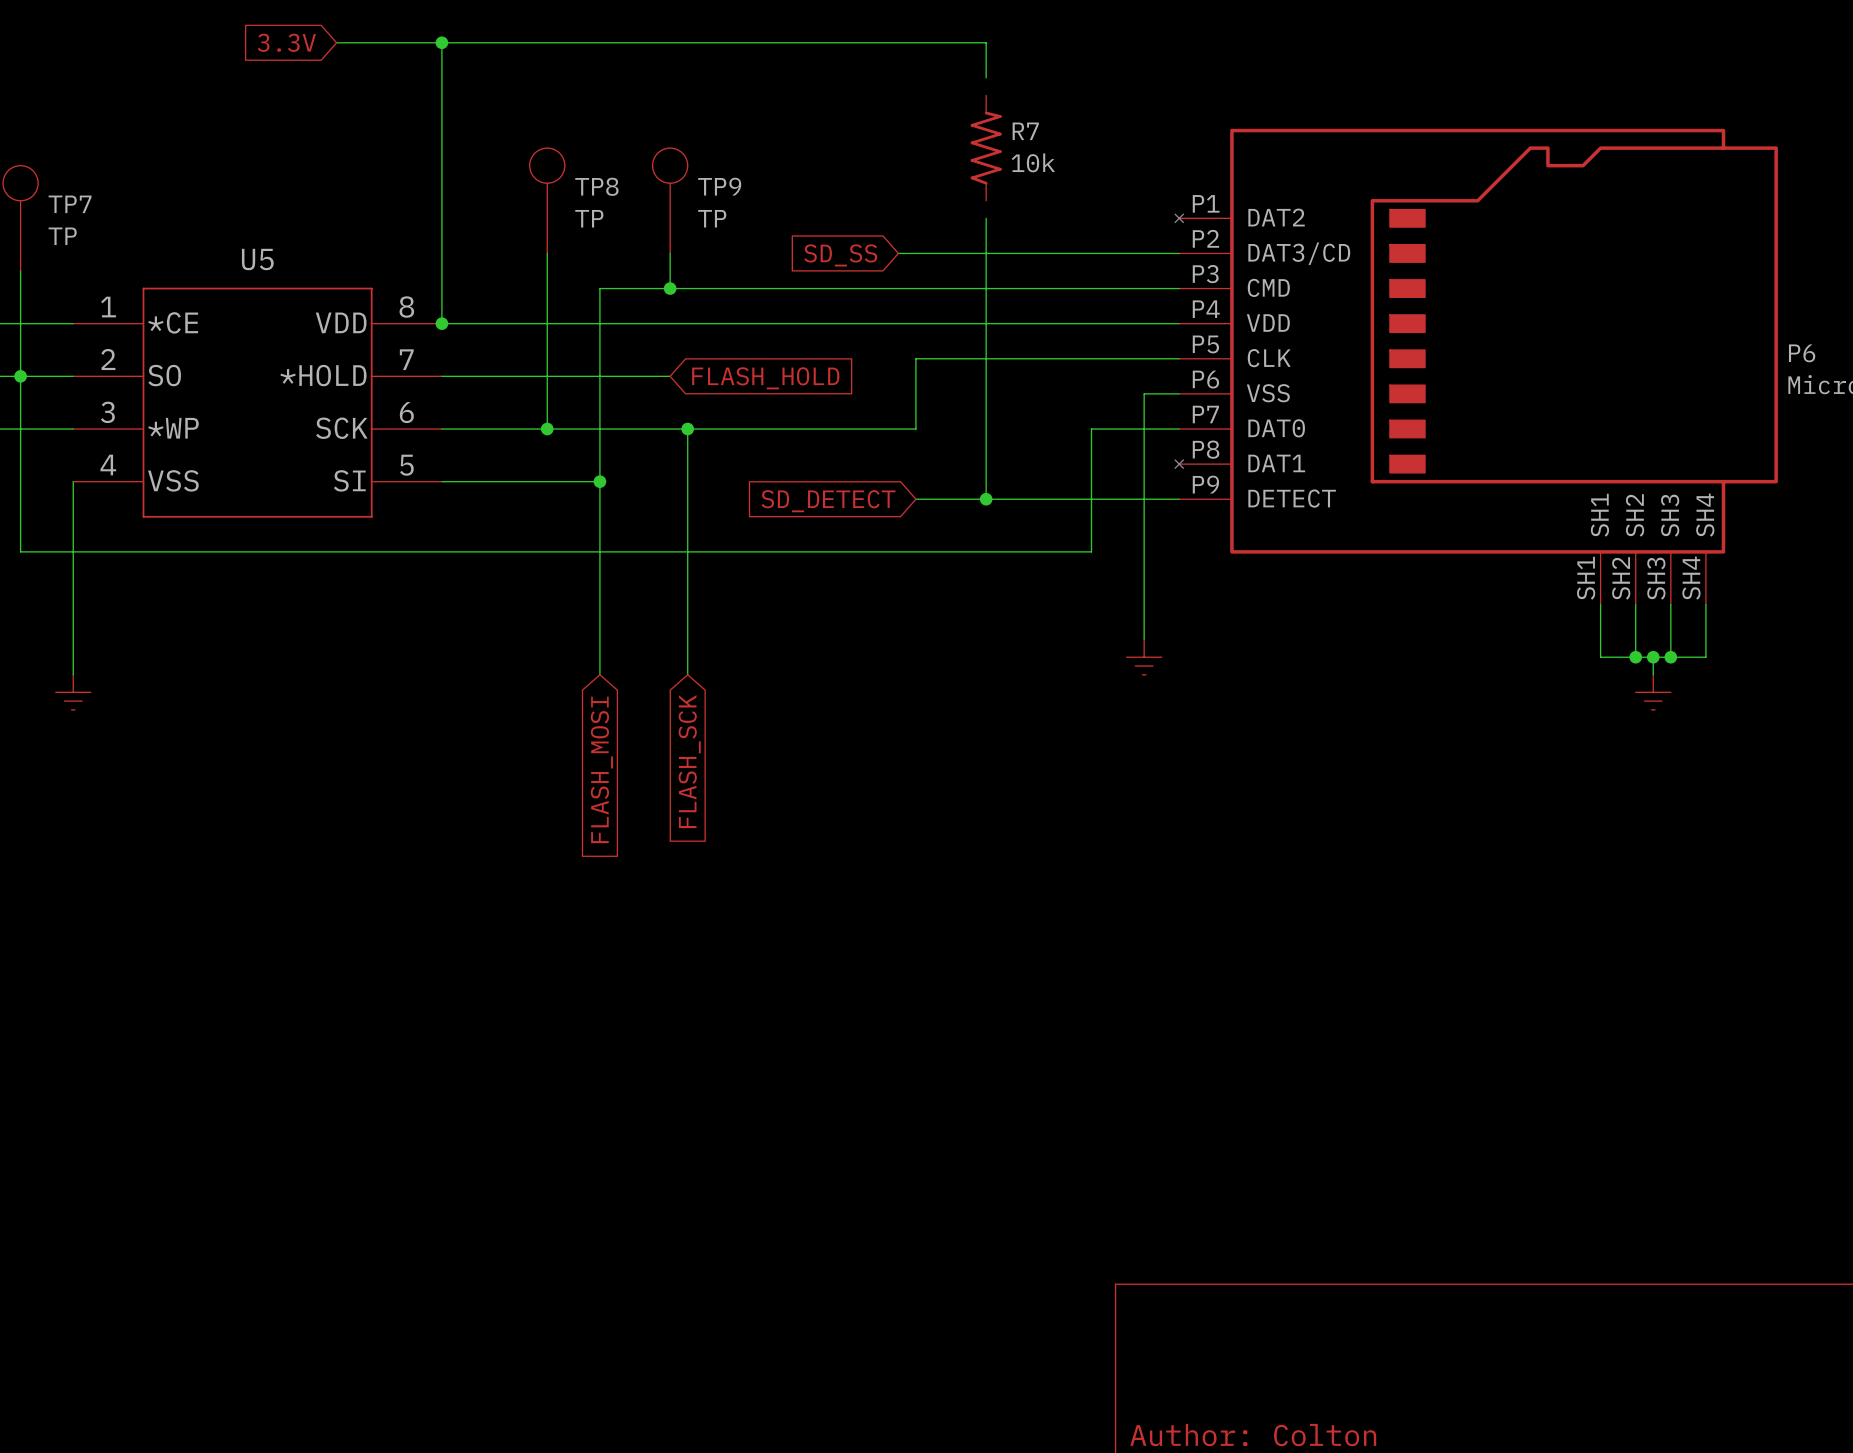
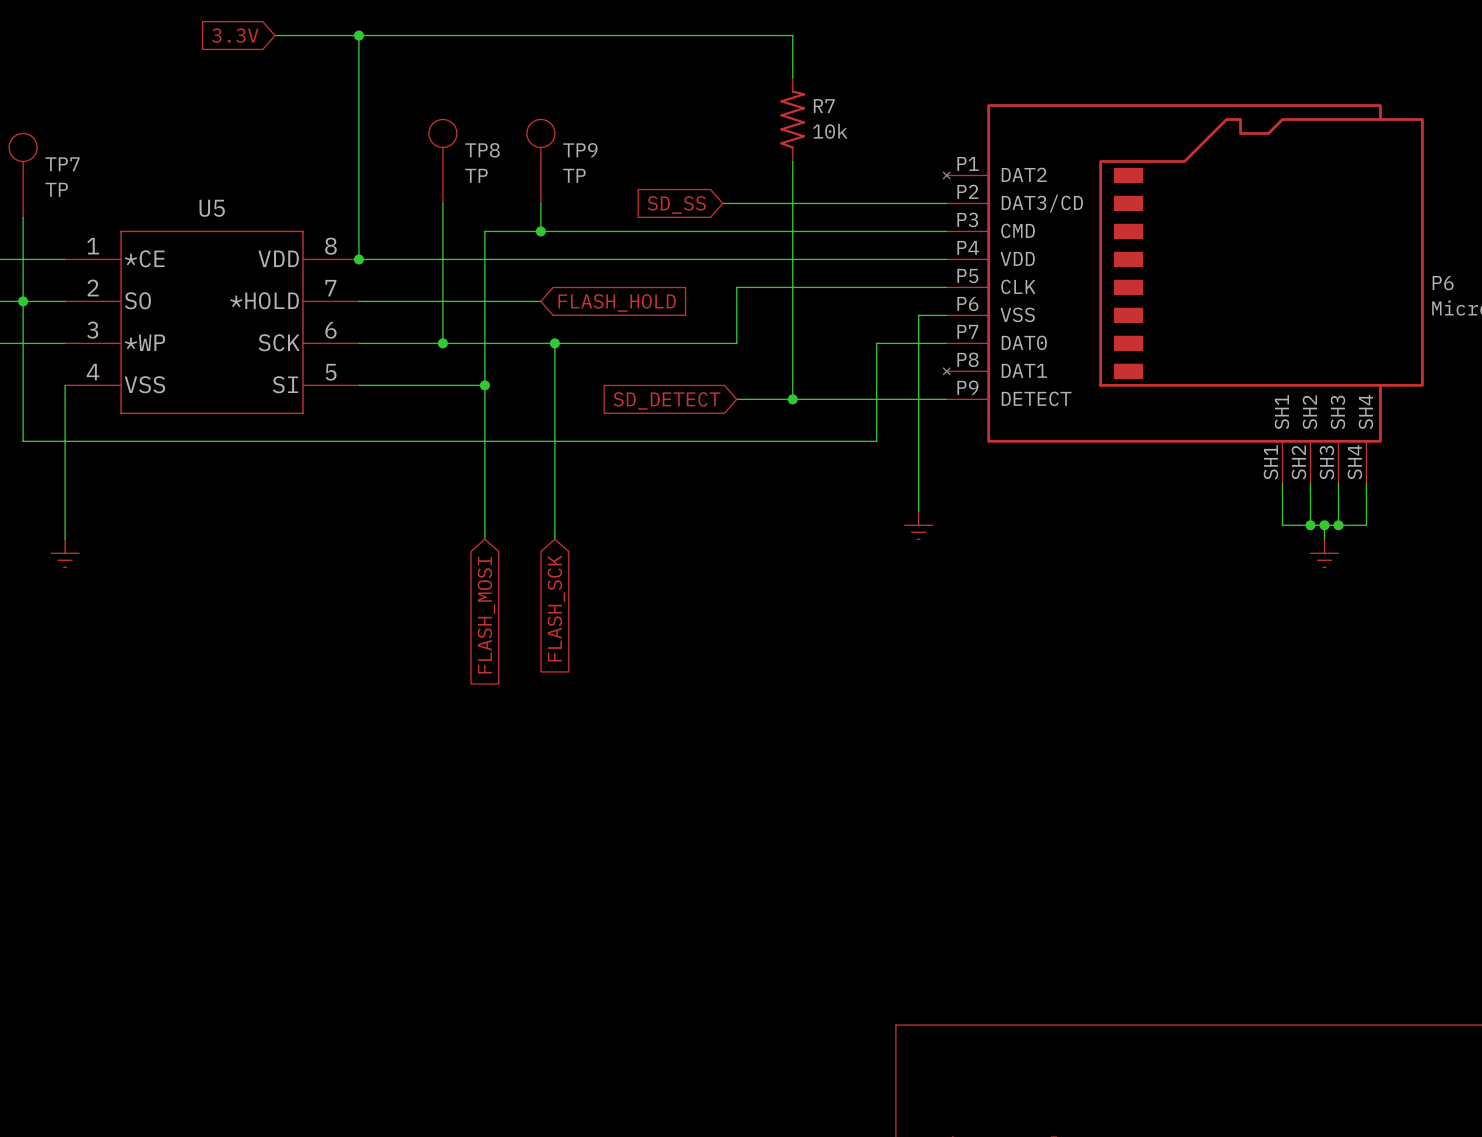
wire: none -> (792, 63) (792, 77)
wire: none -> (792, 161) (792, 175)

